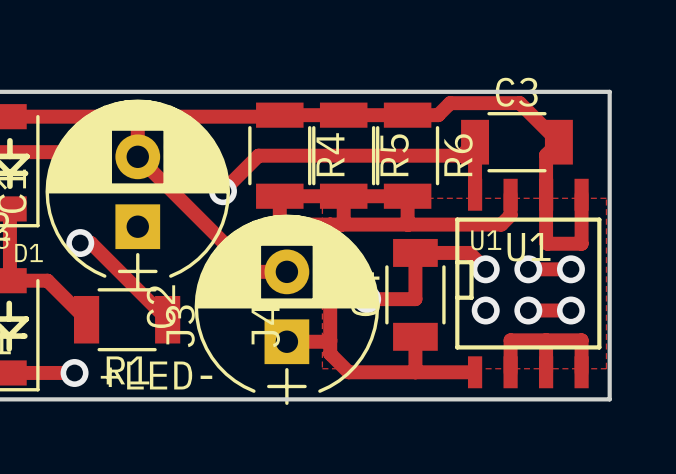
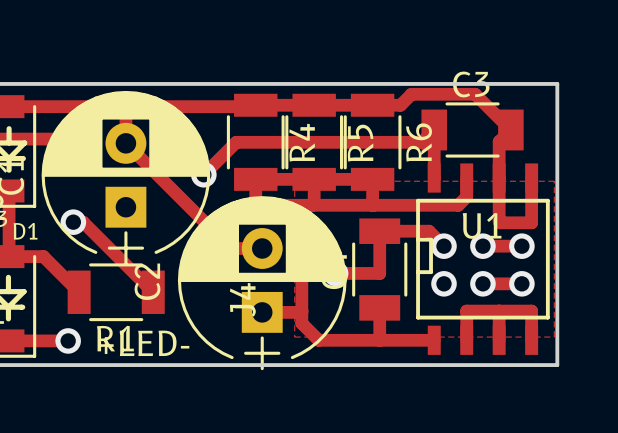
text: U1 (486, 240) -> none
J3: (180, 326) -> none

